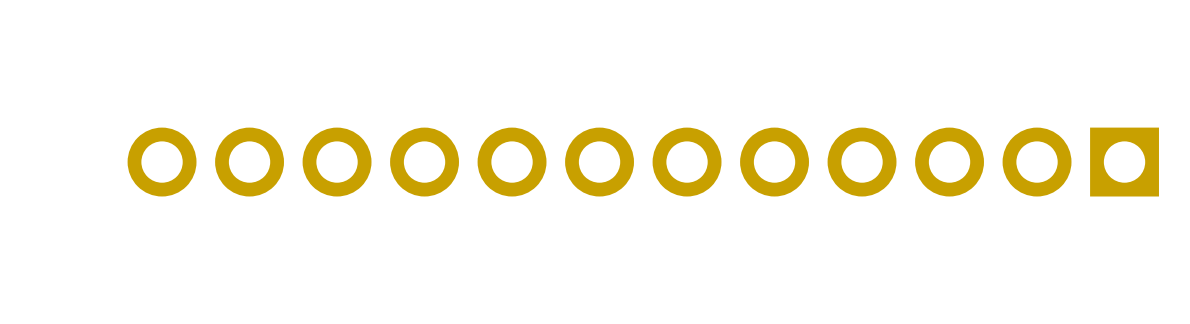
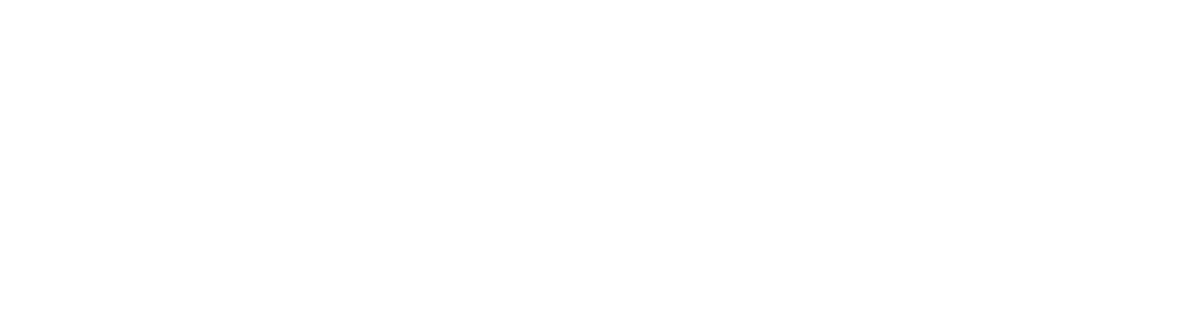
part: (643, 162) -> none

